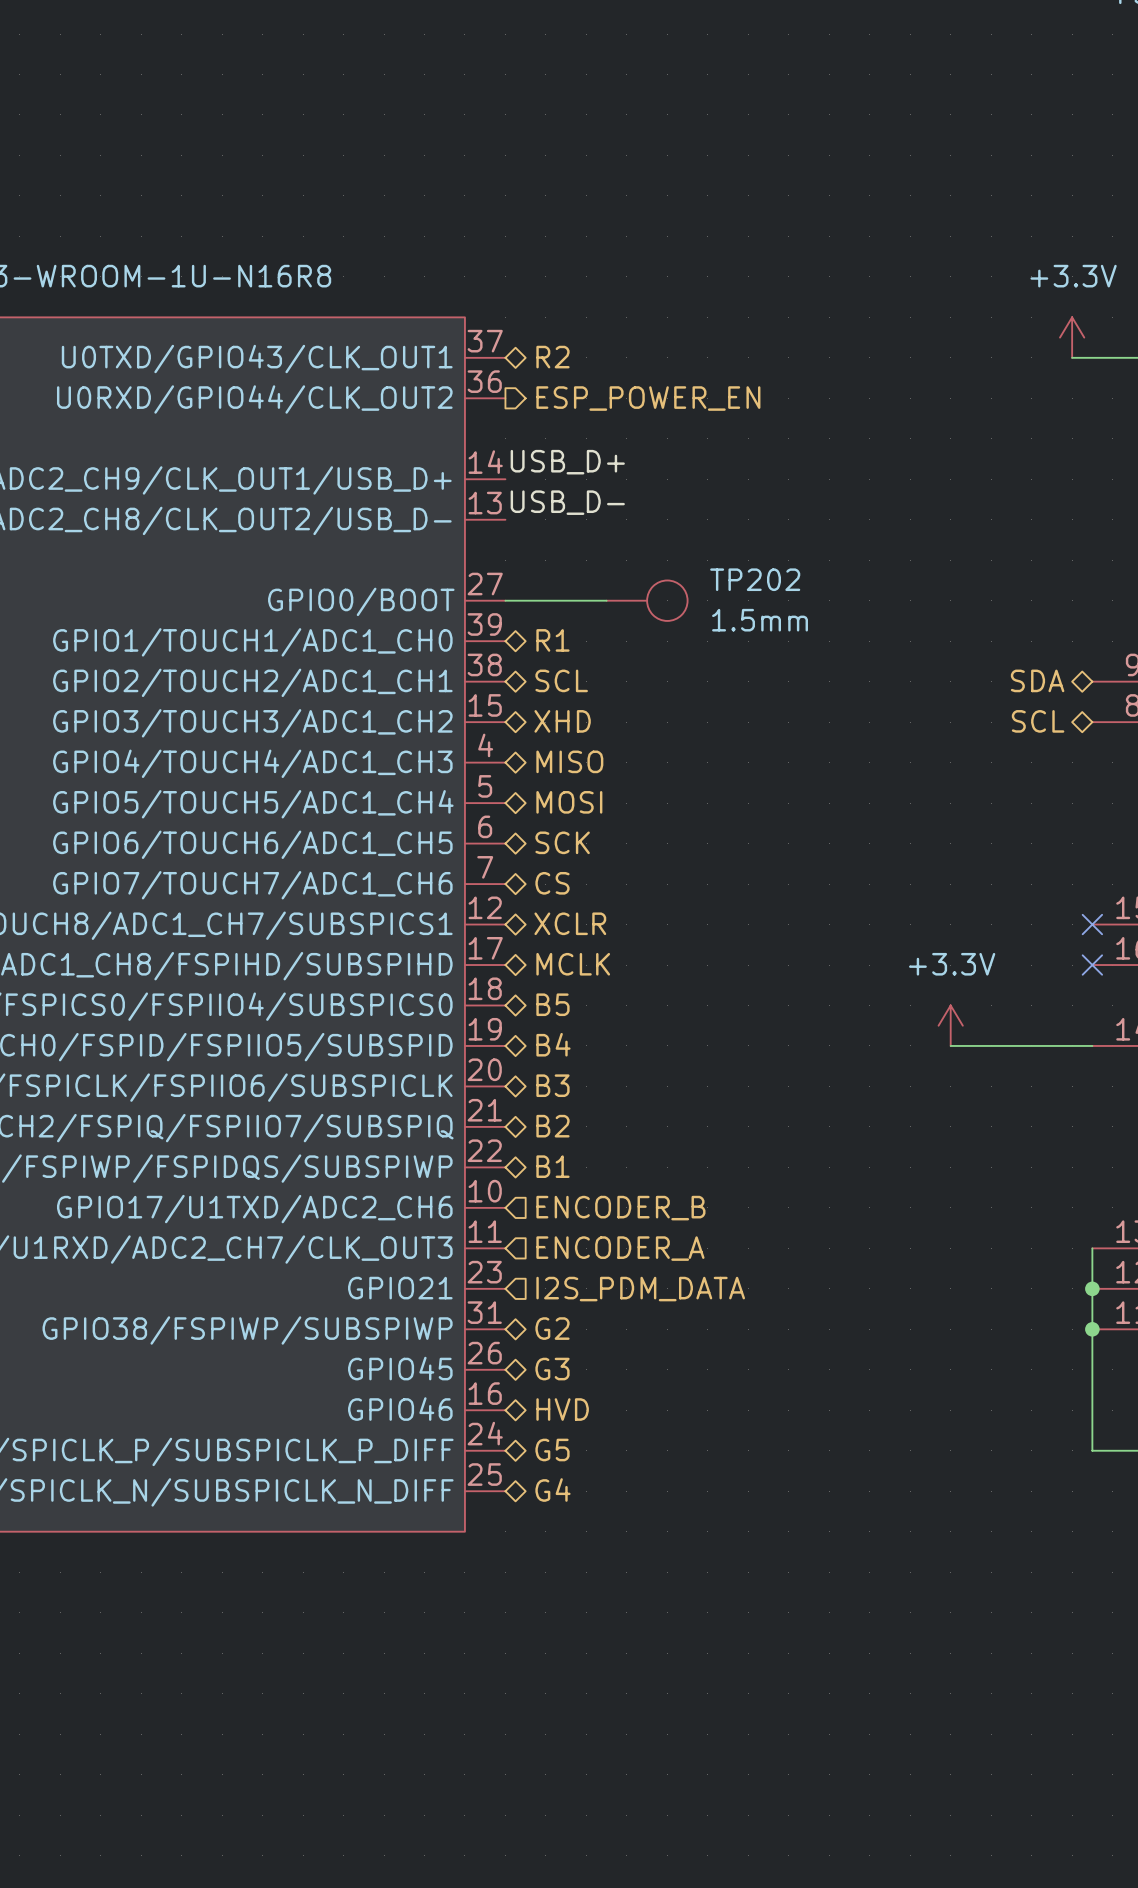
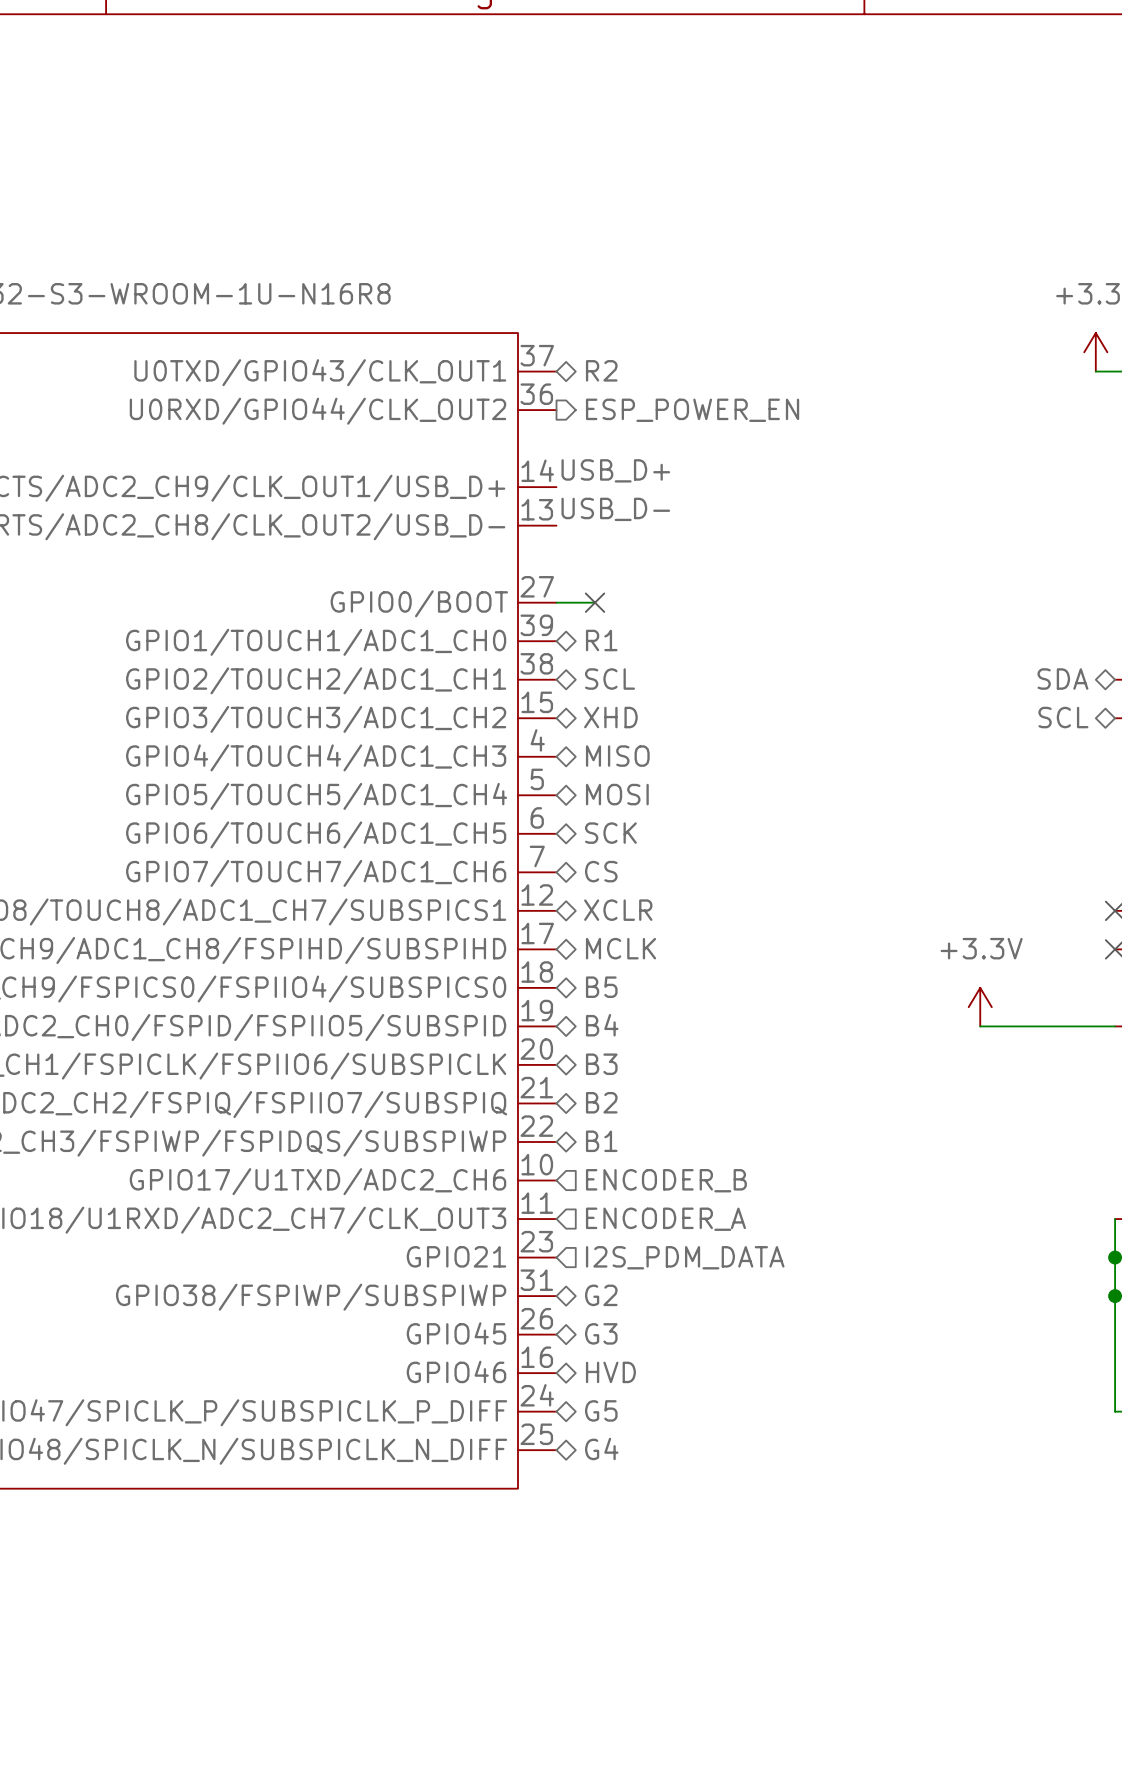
wire: (545, 600) (606, 600) -> none
no-connect mark: none -> (595, 602)
TP202: (647, 600) -> none

